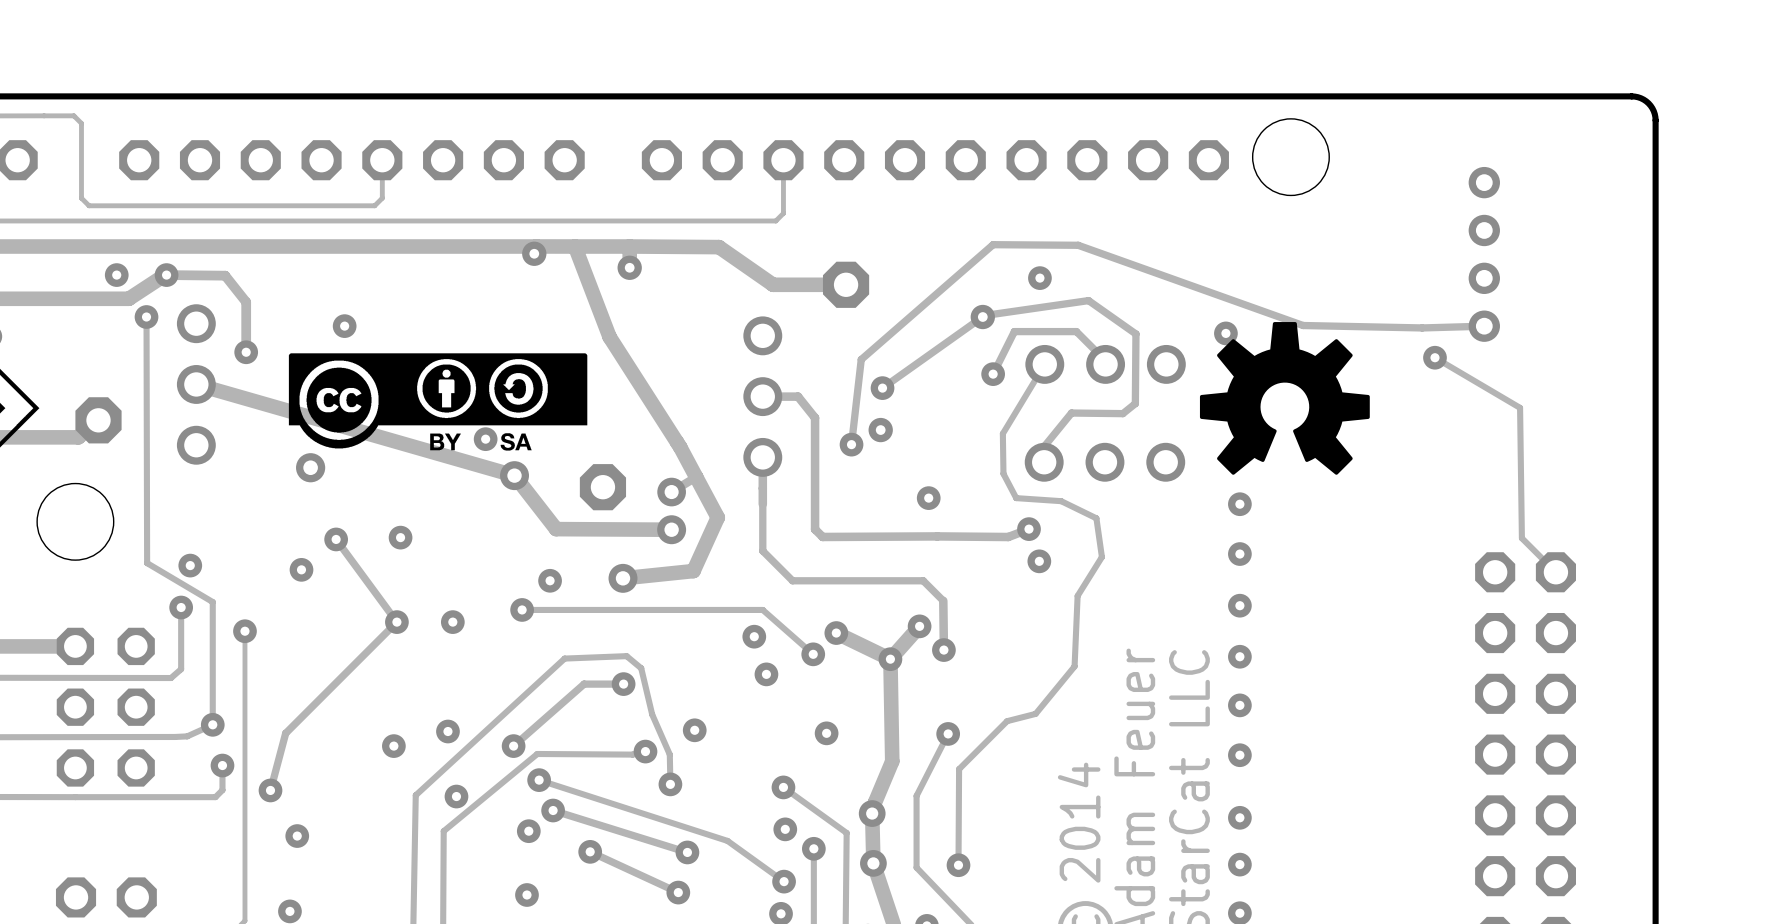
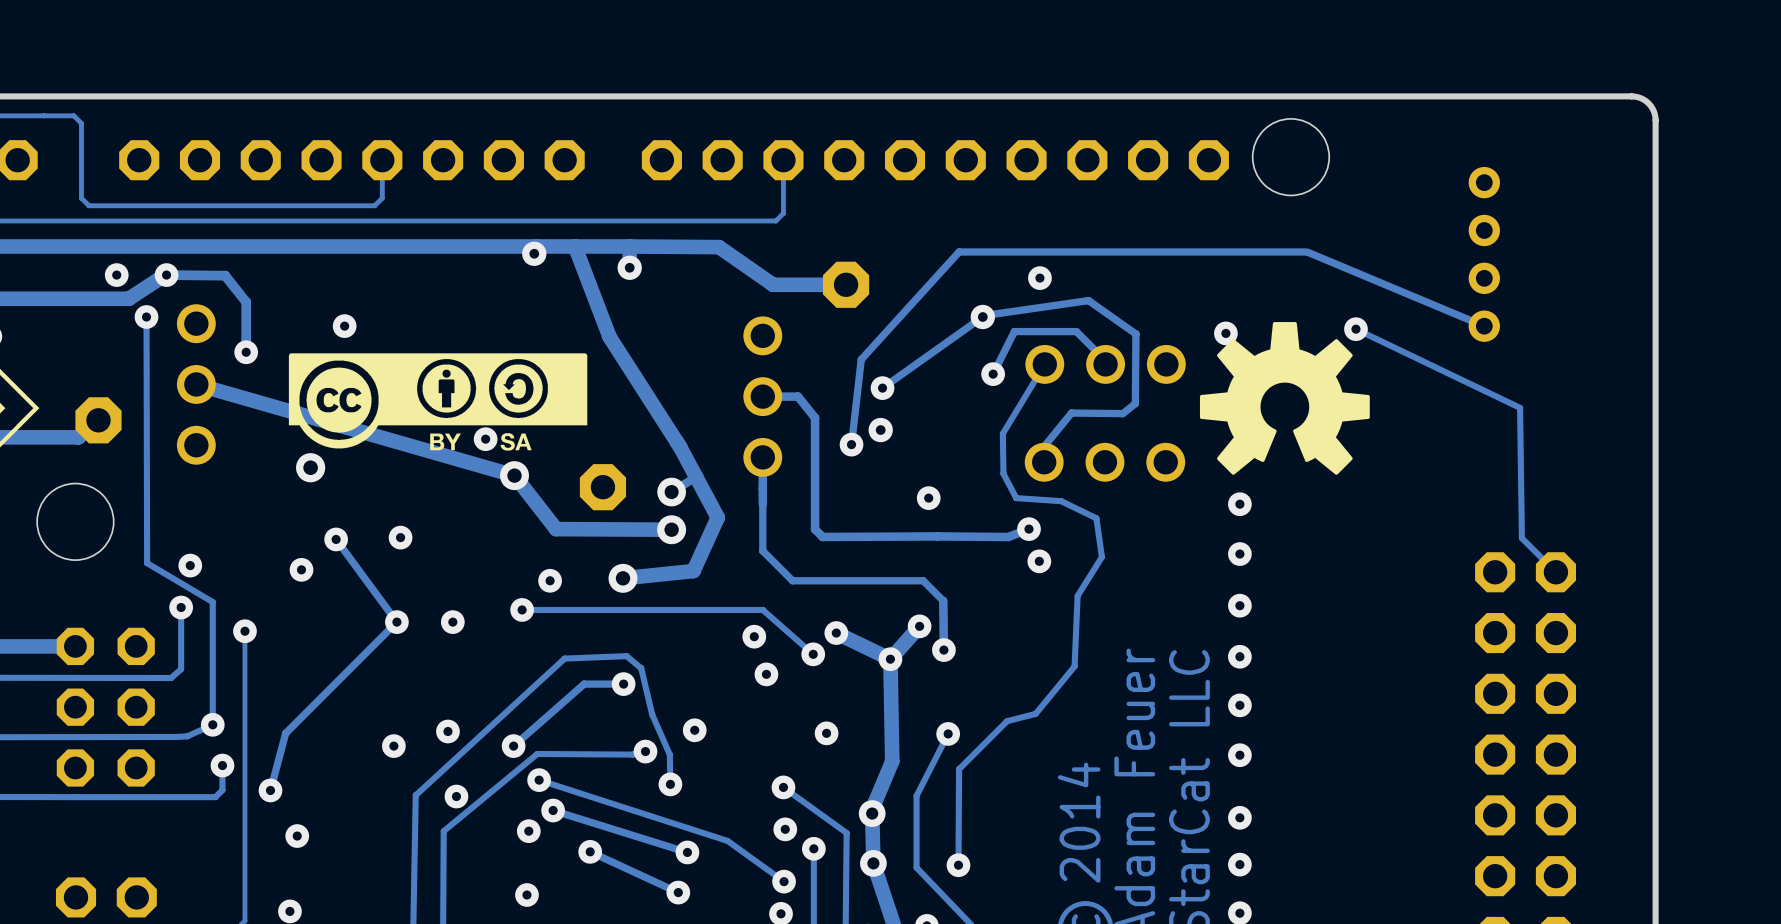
track: (1484, 326) (1422, 327) (1303, 325) (1078, 245) (993, 244) (861, 359) -> (1484, 326) (1306, 251) (959, 251) (861, 359)
track: (1434, 357) (1520, 407) -> (1355, 329) (1520, 407)
via position: (1434, 357) -> (1355, 329)

